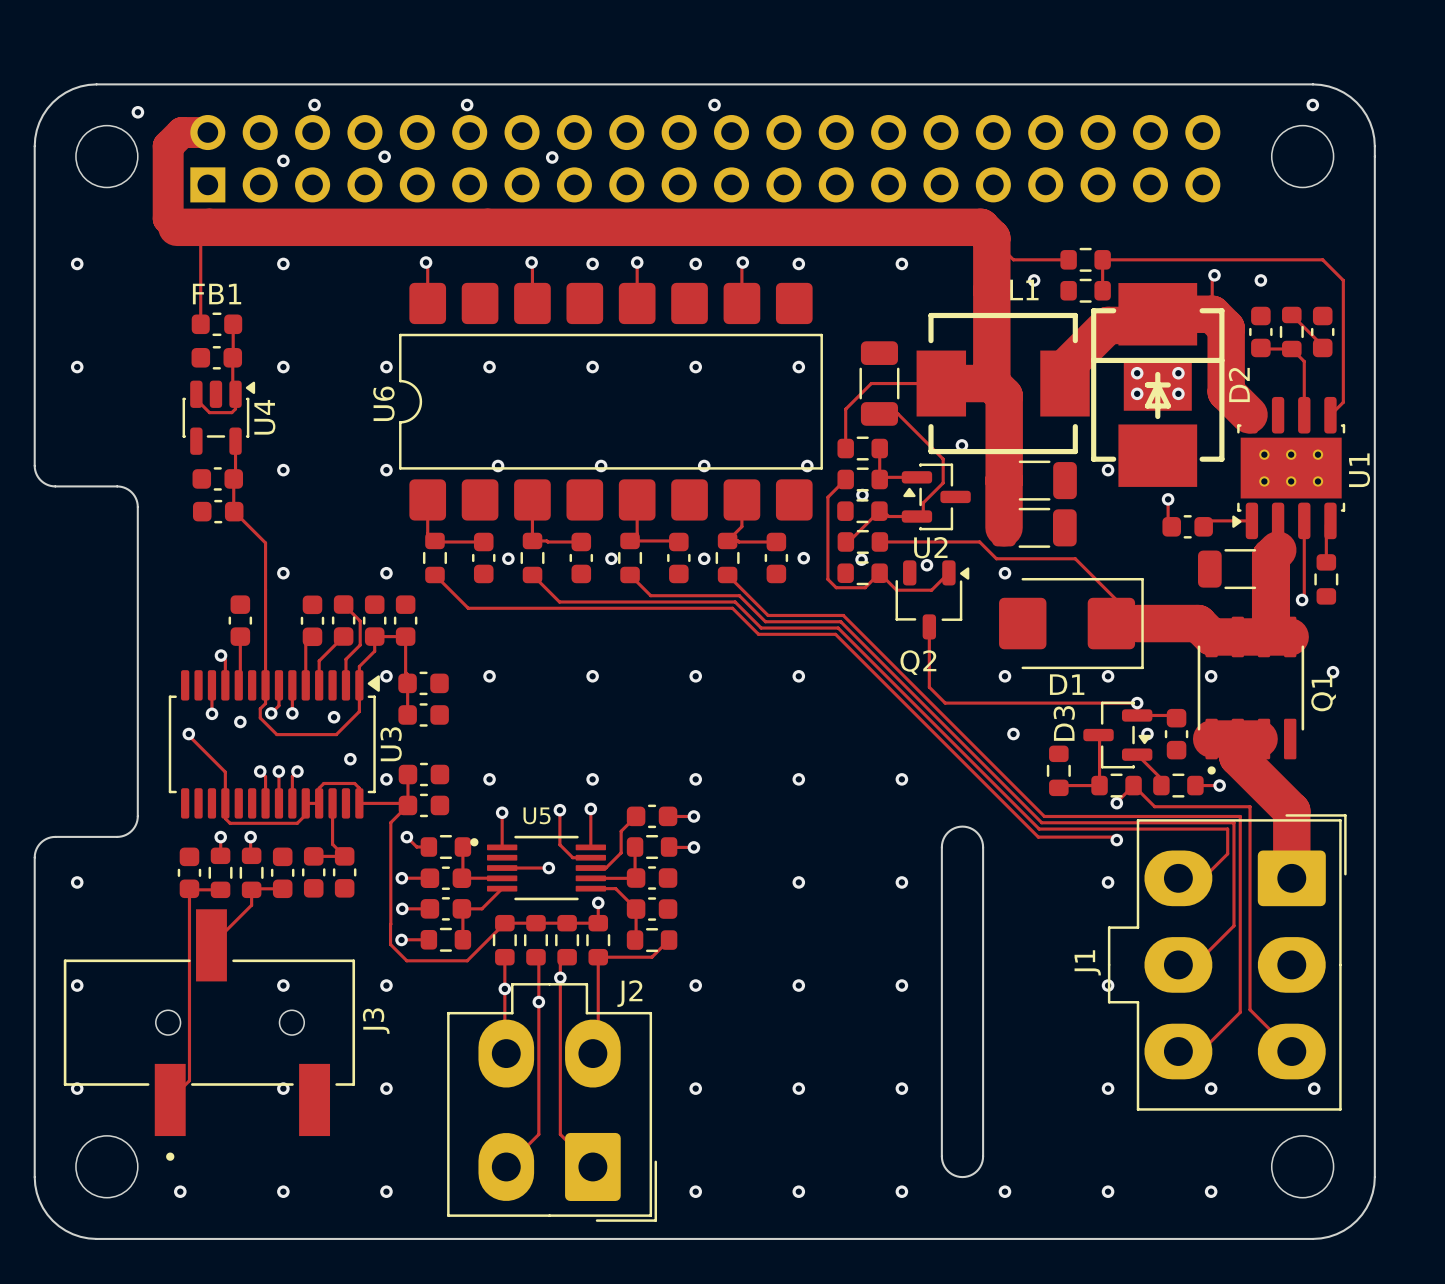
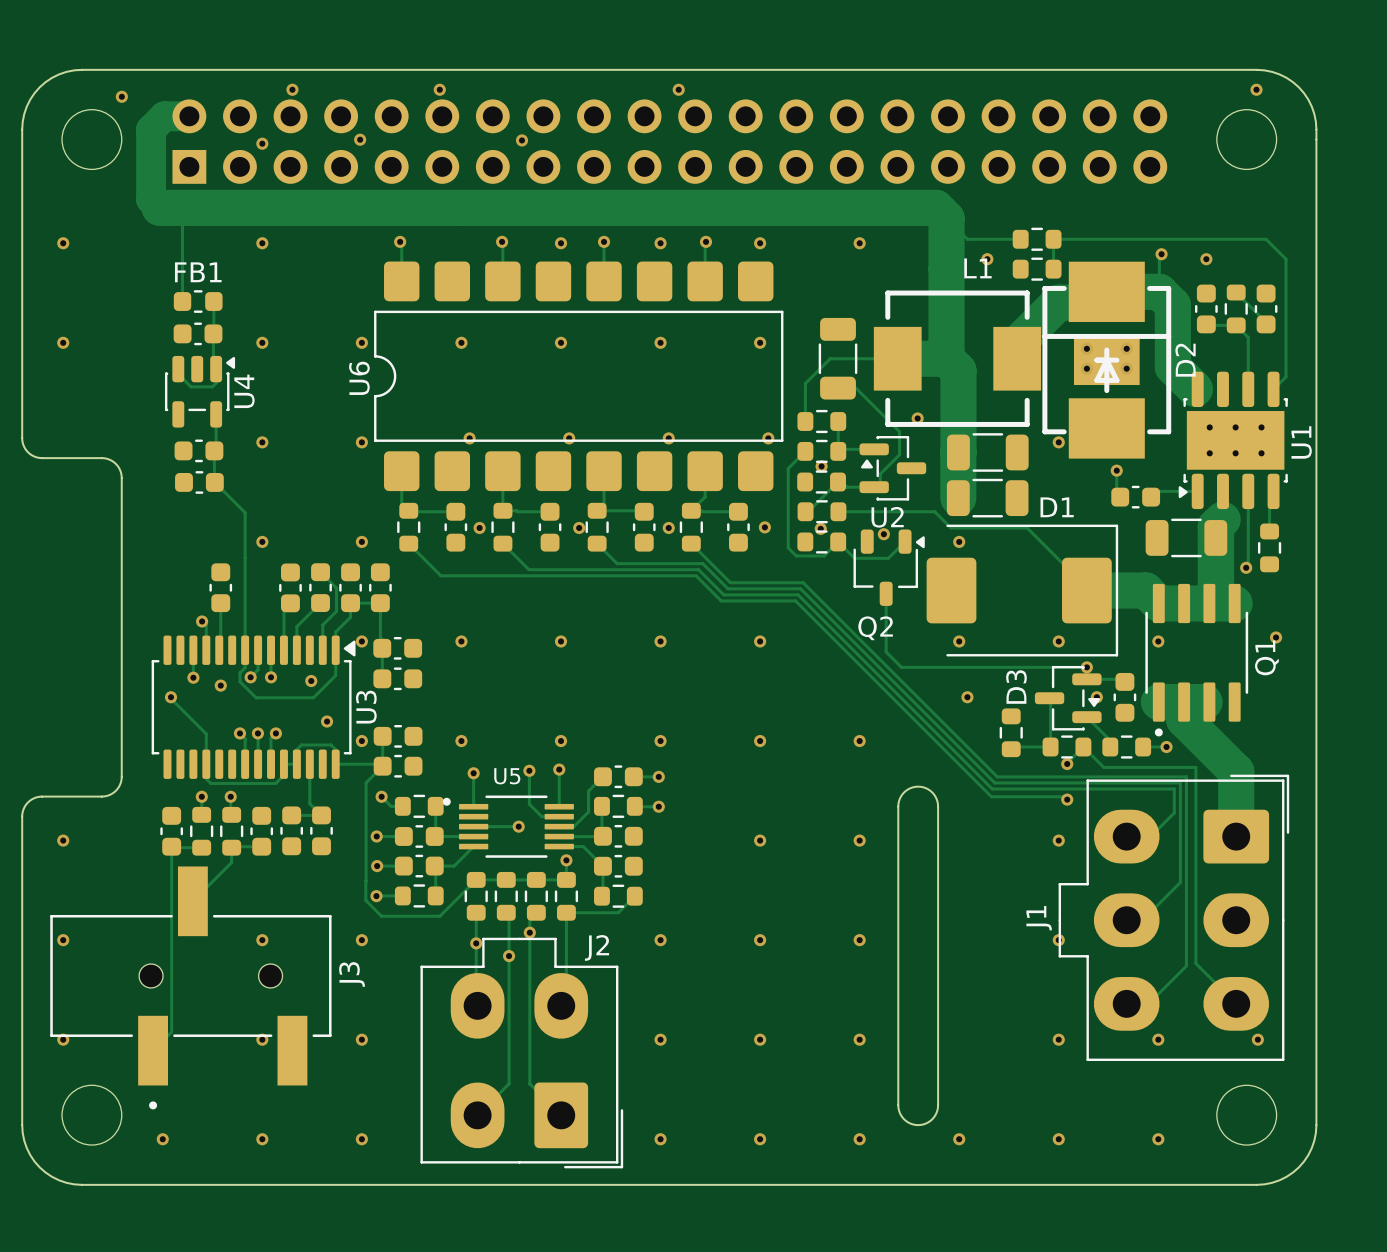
D1 footprint: [999, 577, 1144, 670] -> [926, 524, 1119, 657]
D1 name position: D1 (1067, 684) -> D1 (1057, 507)

